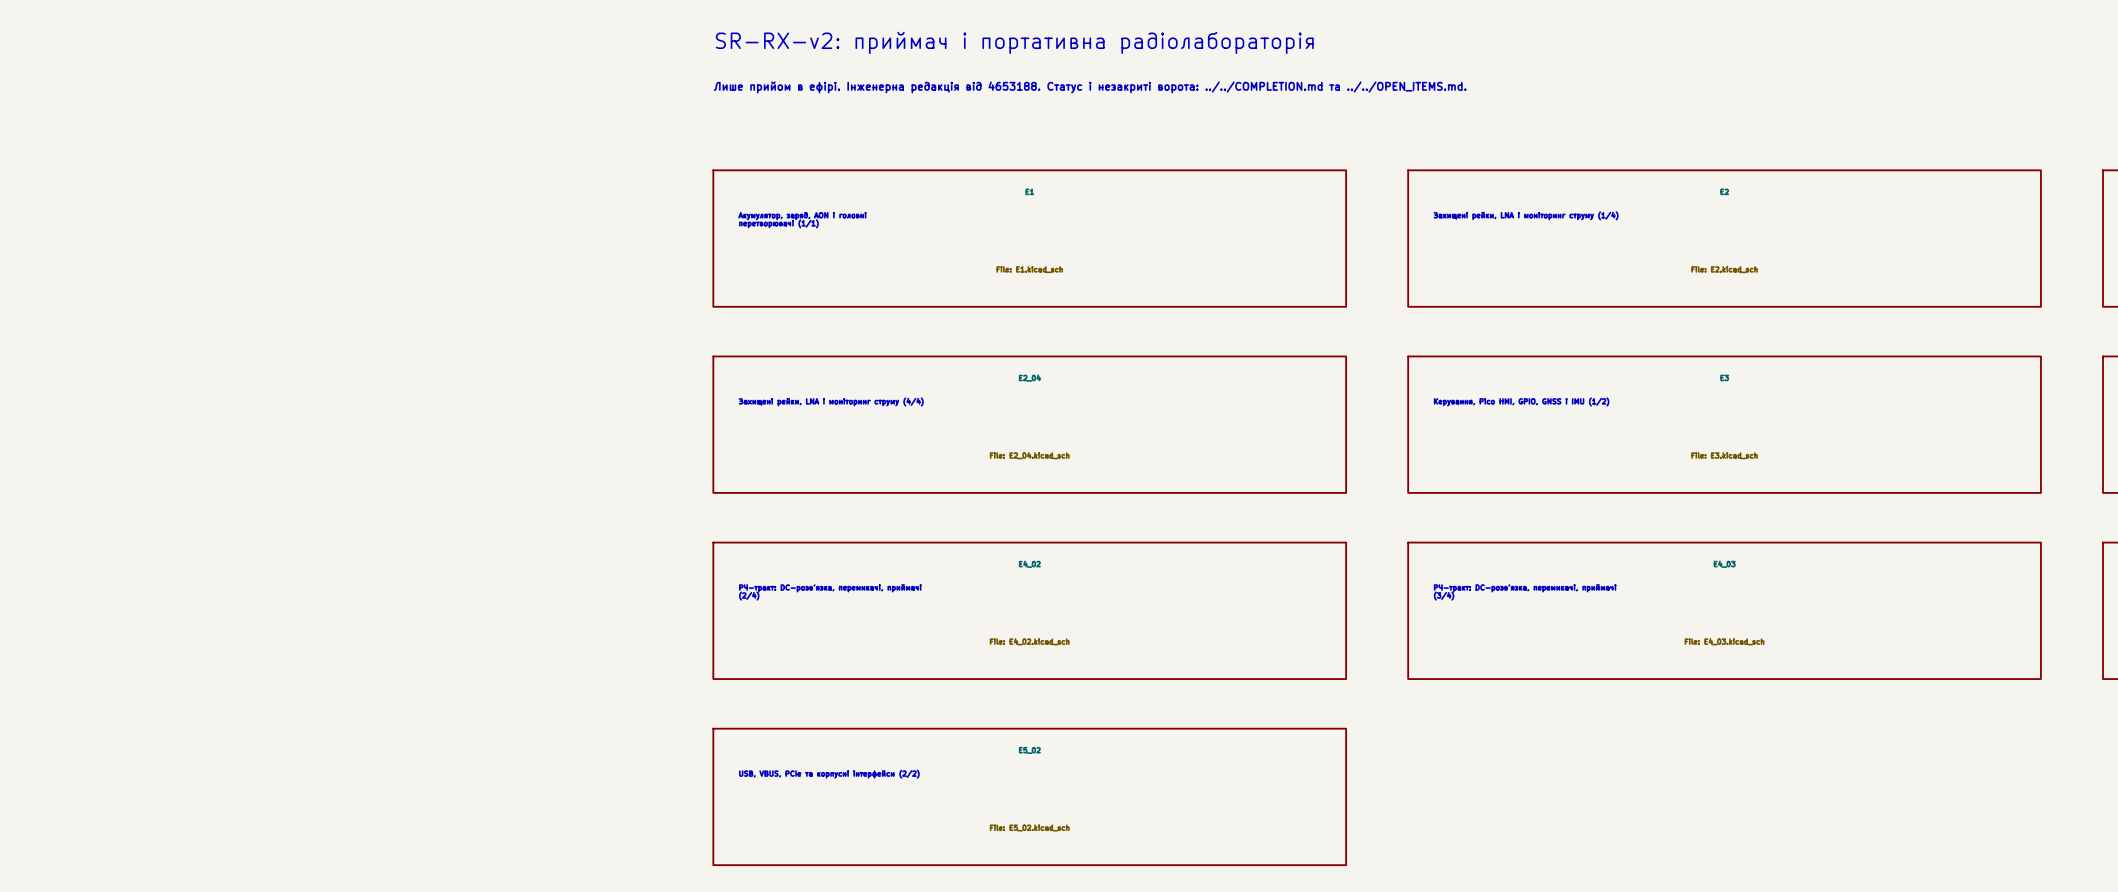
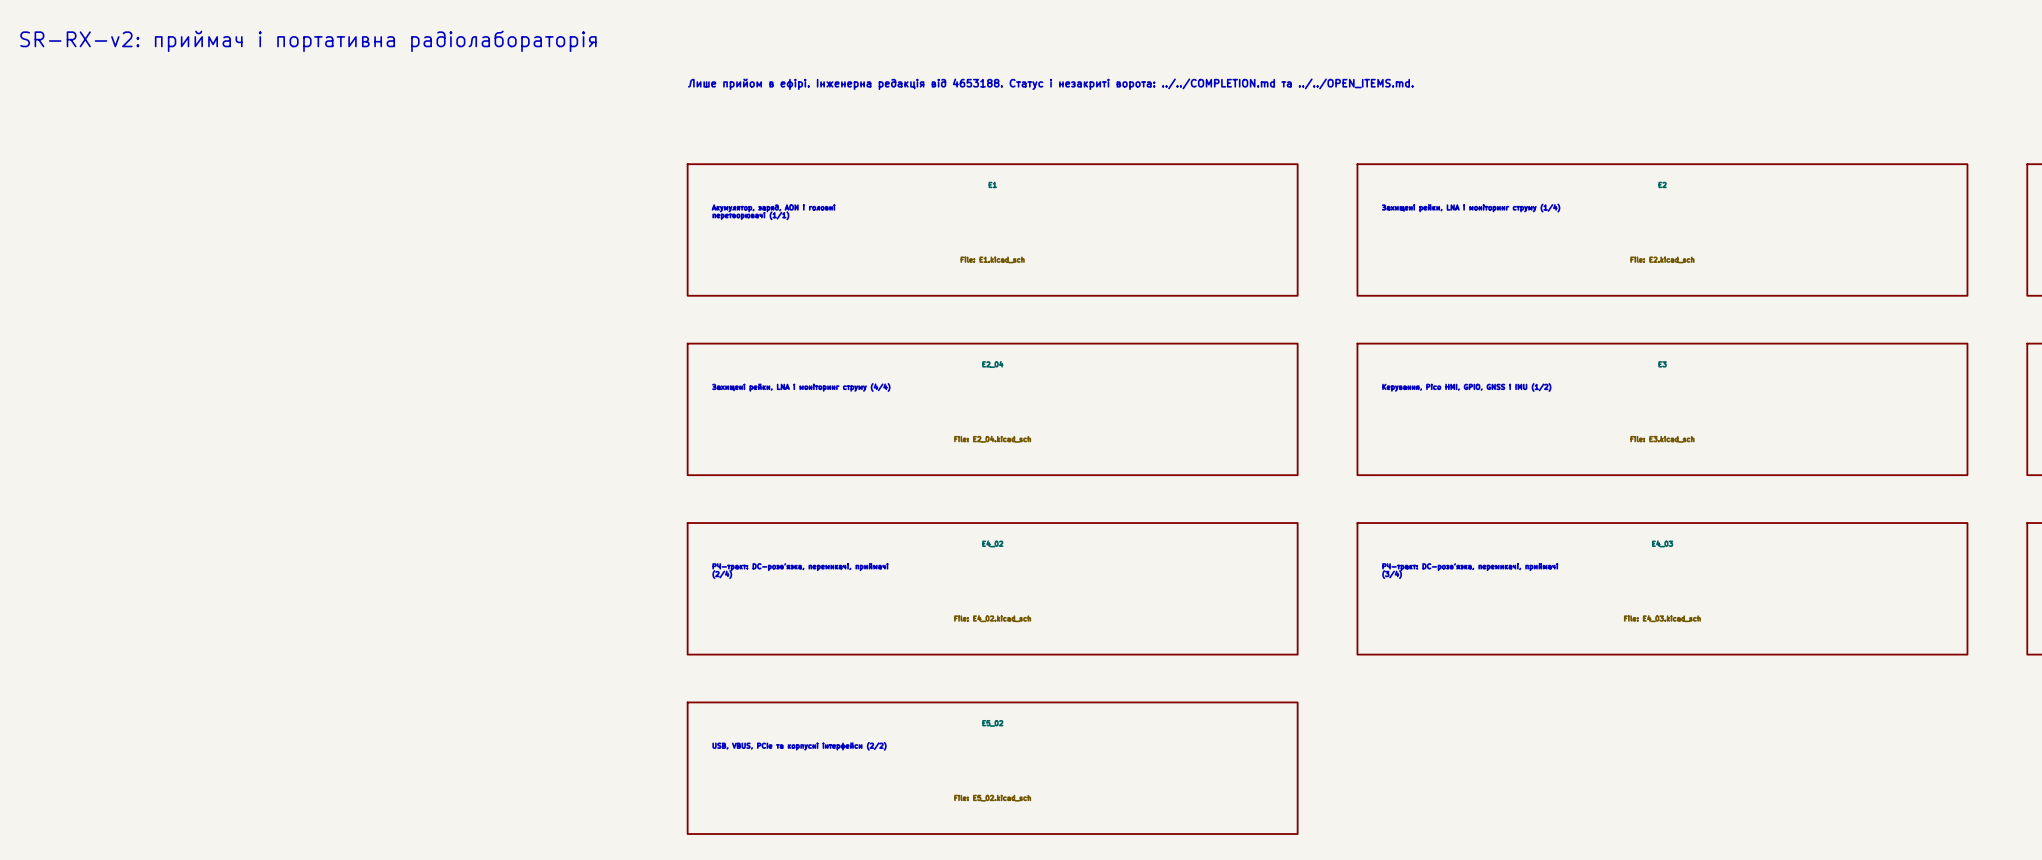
text: none -> SR-RX-v2: приймач і портативна радіолабораторія (308, 41)
text: SR-RX-v2: приймач і портативна радіолабораторія (1014, 42) -> none

